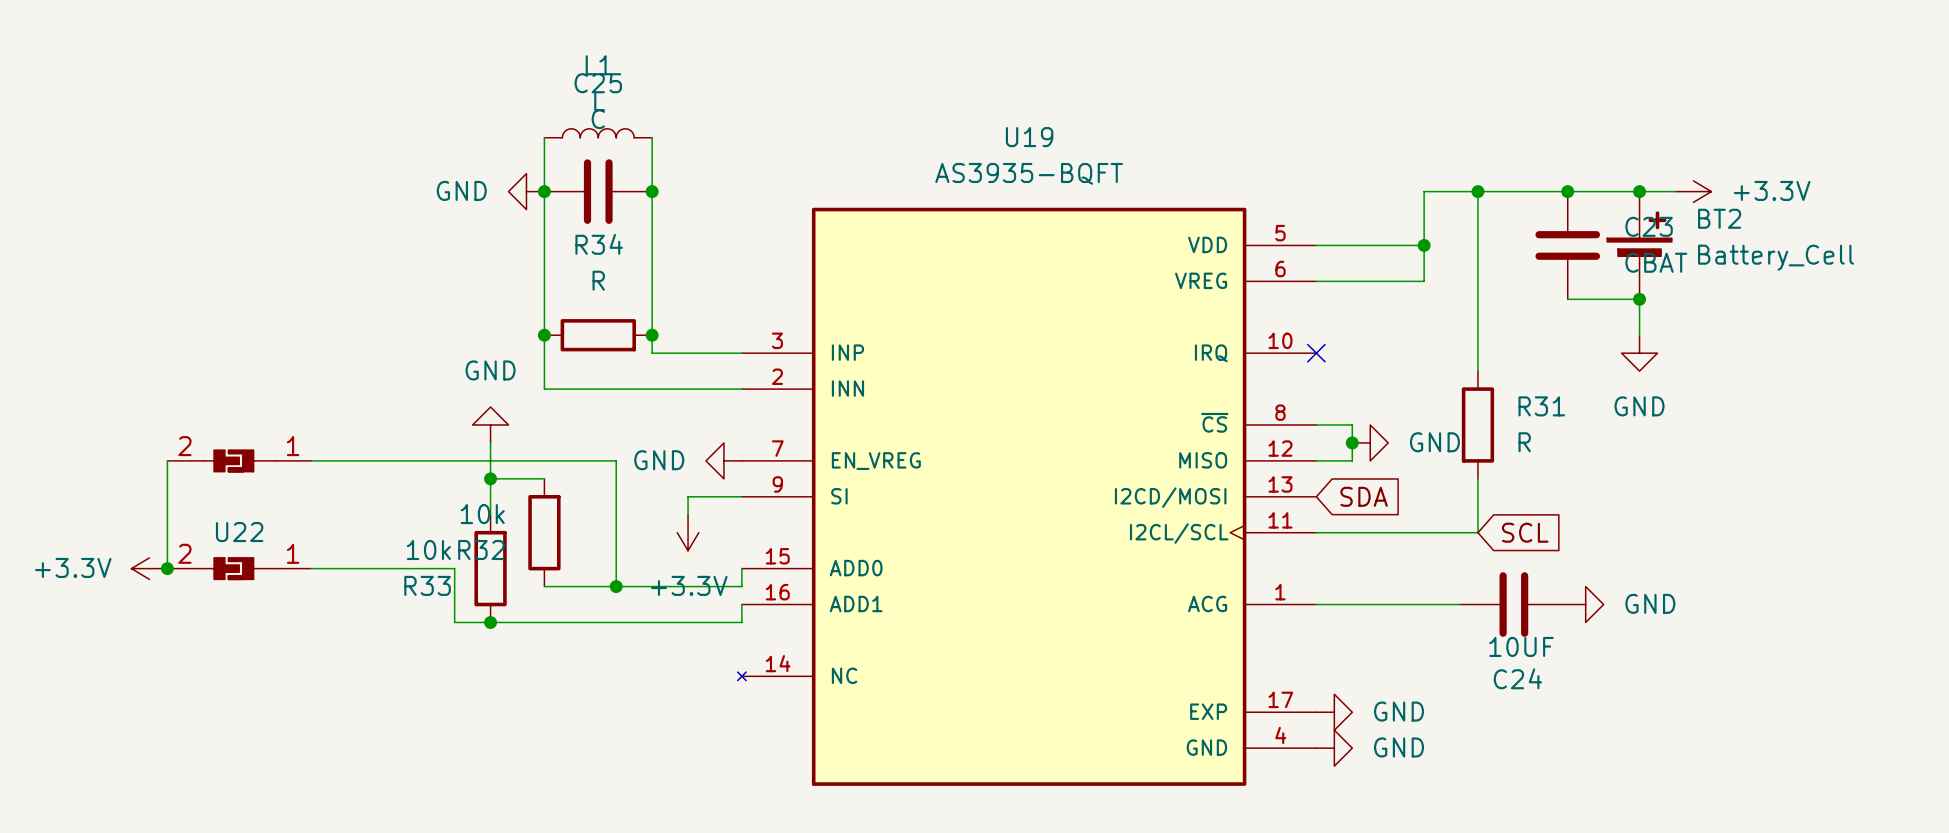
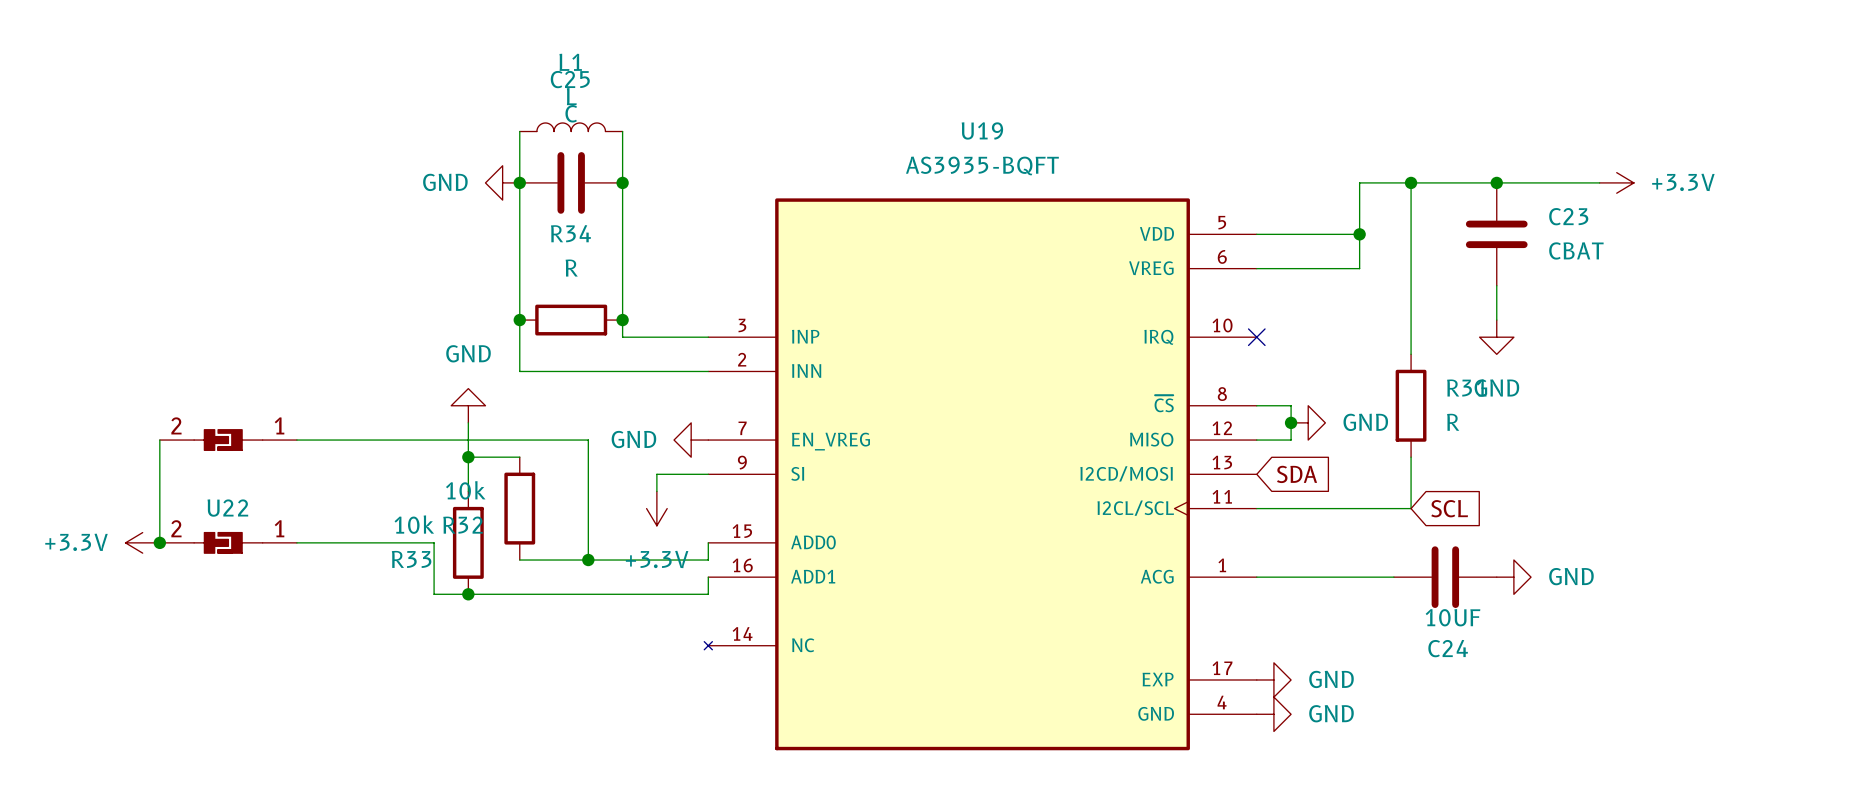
junction: (1639, 191) -> none
BT2: Battery_Cell (1639, 245) -> none
wire: (1567, 299) (1639, 299) (1639, 335) -> (1496, 285) (1496, 320)
junction: (1639, 299) -> none
power symbol position: GND (1639, 353) -> GND (1496, 337)

